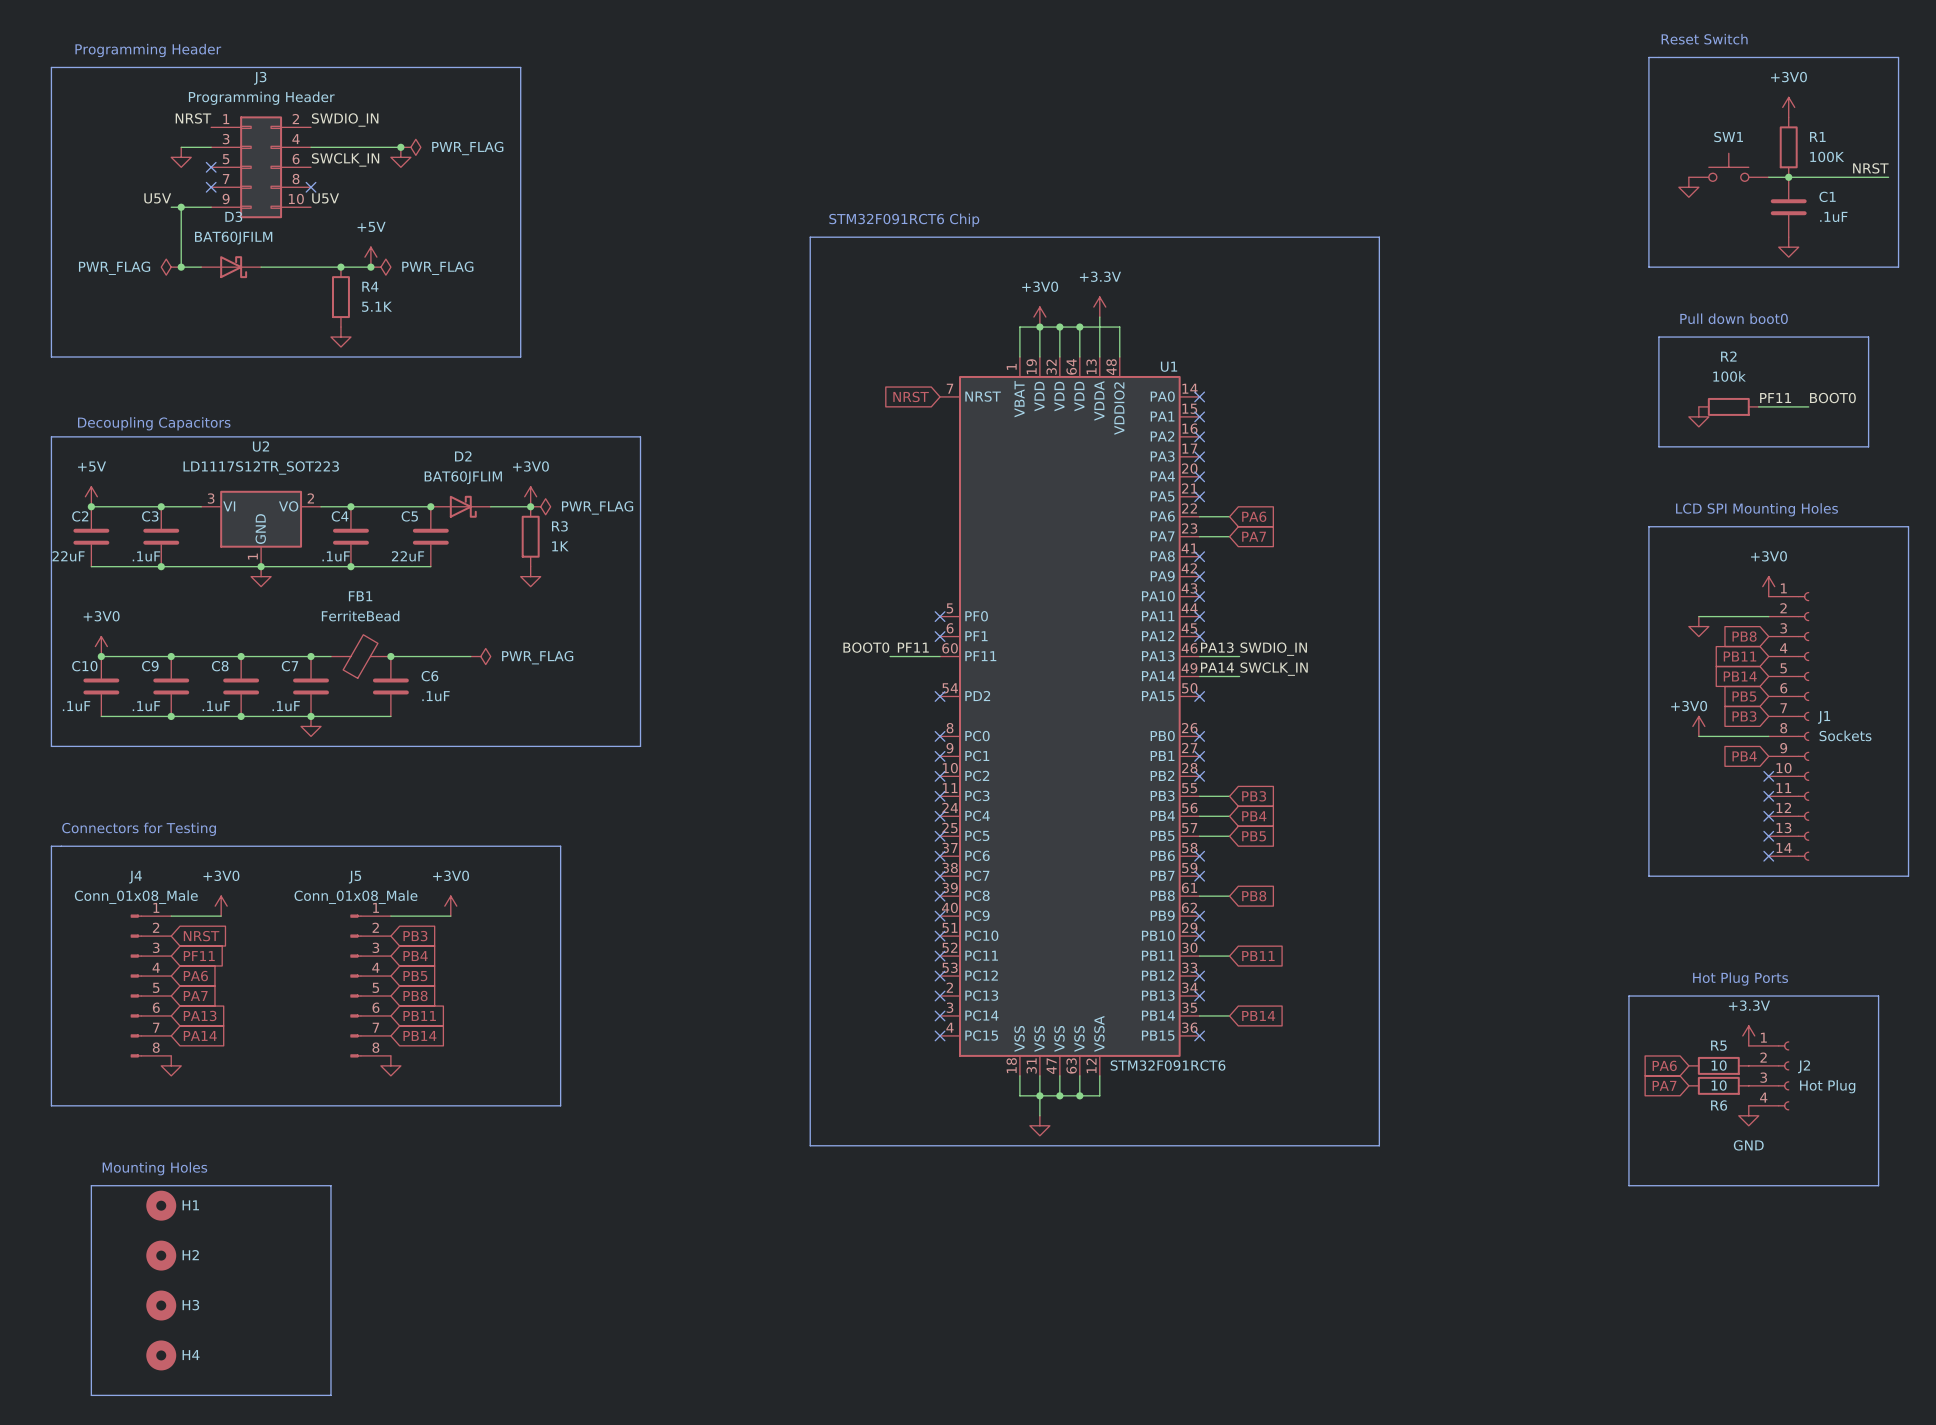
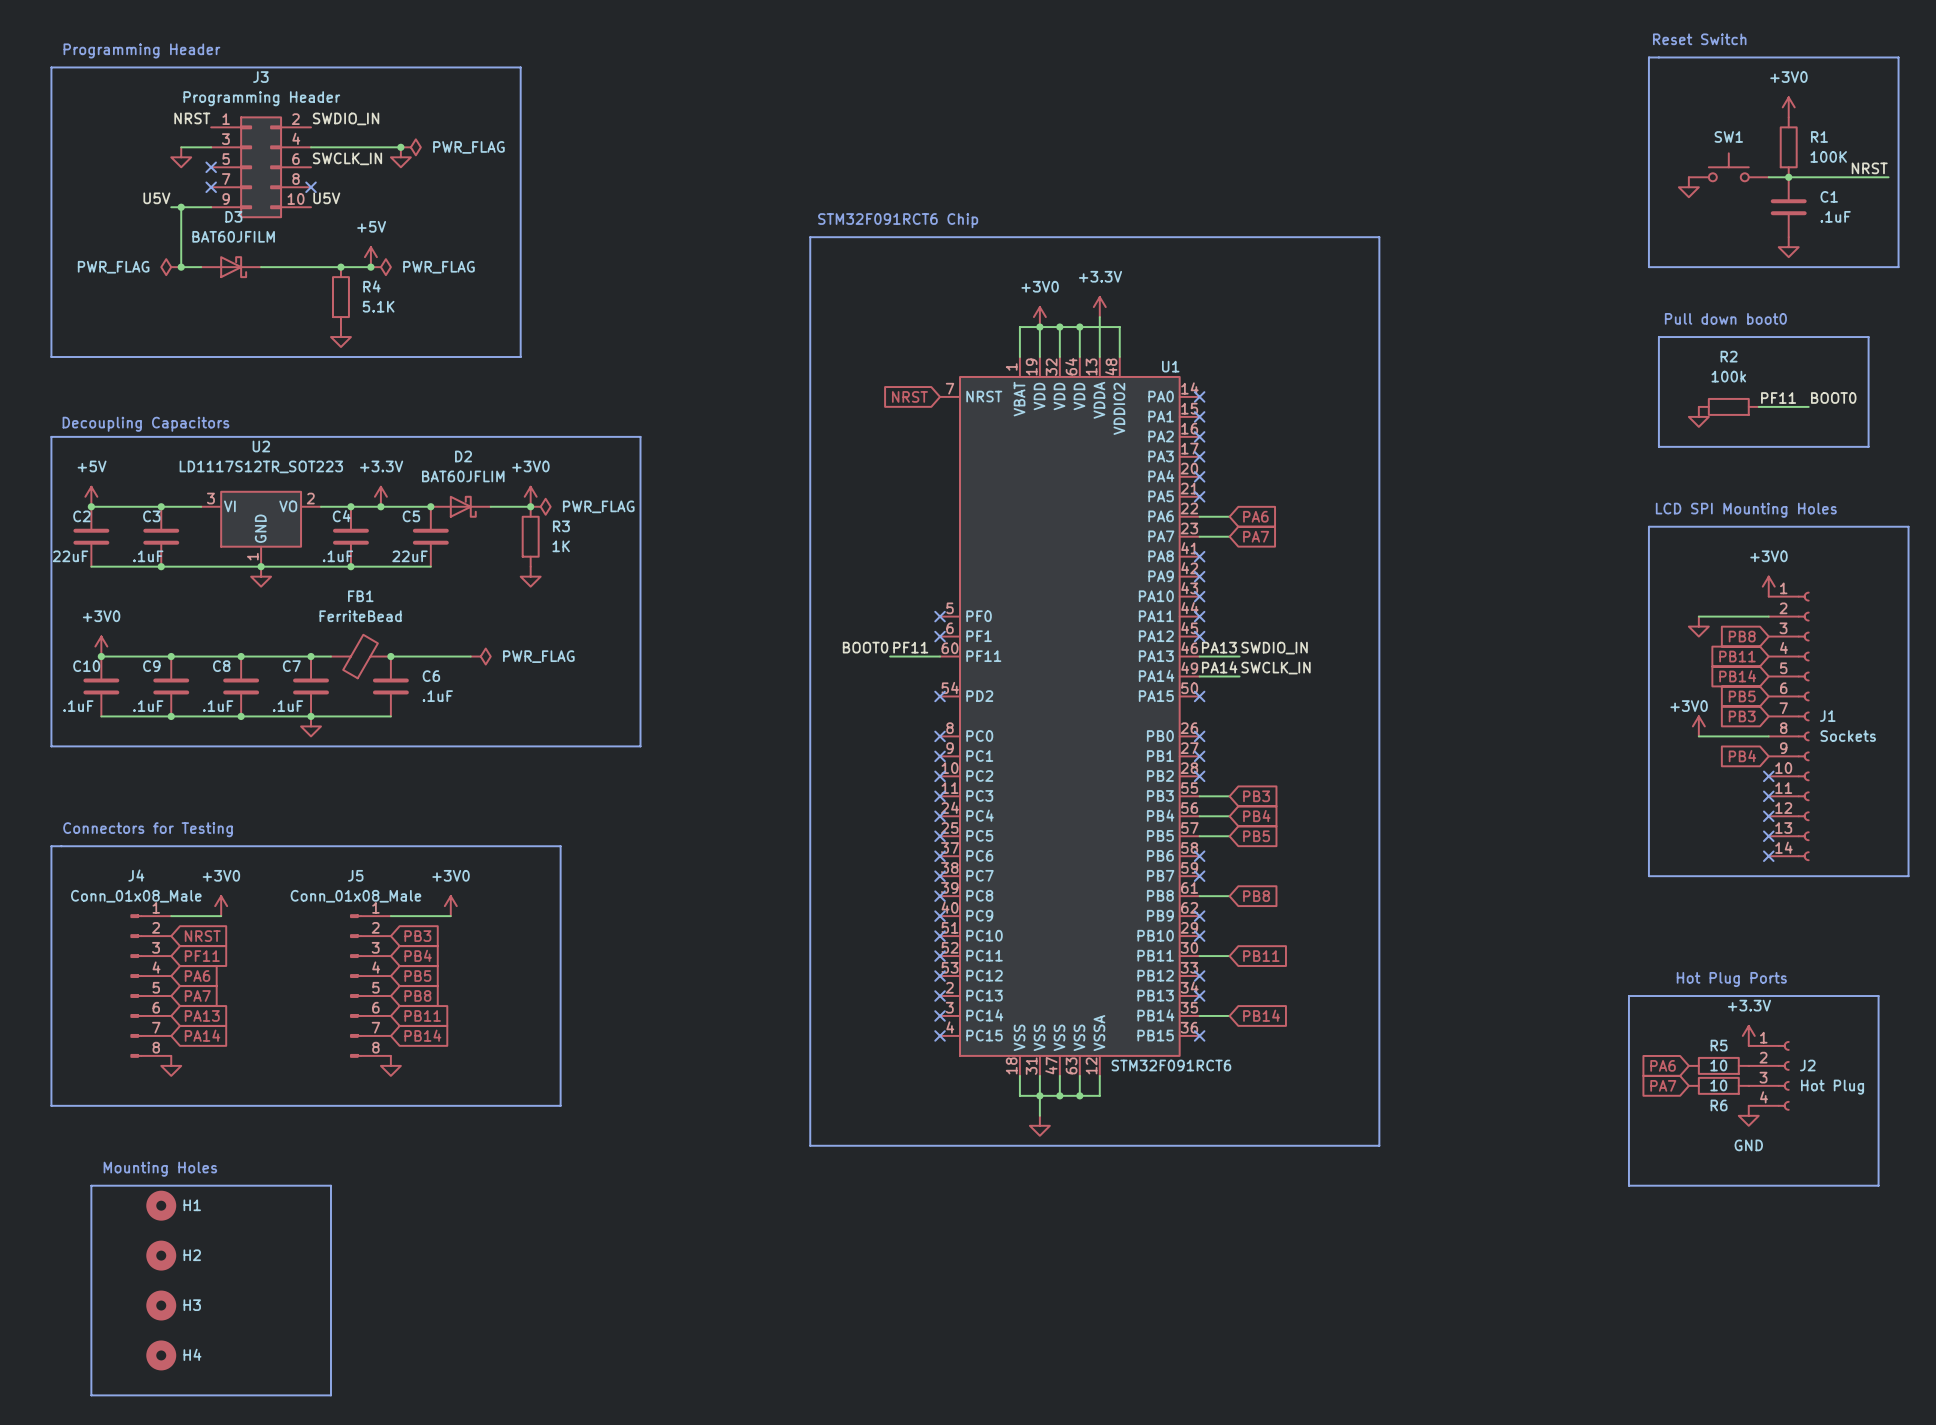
power symbol: none -> +3.3V (380, 496)
junction: none -> (380, 506)

